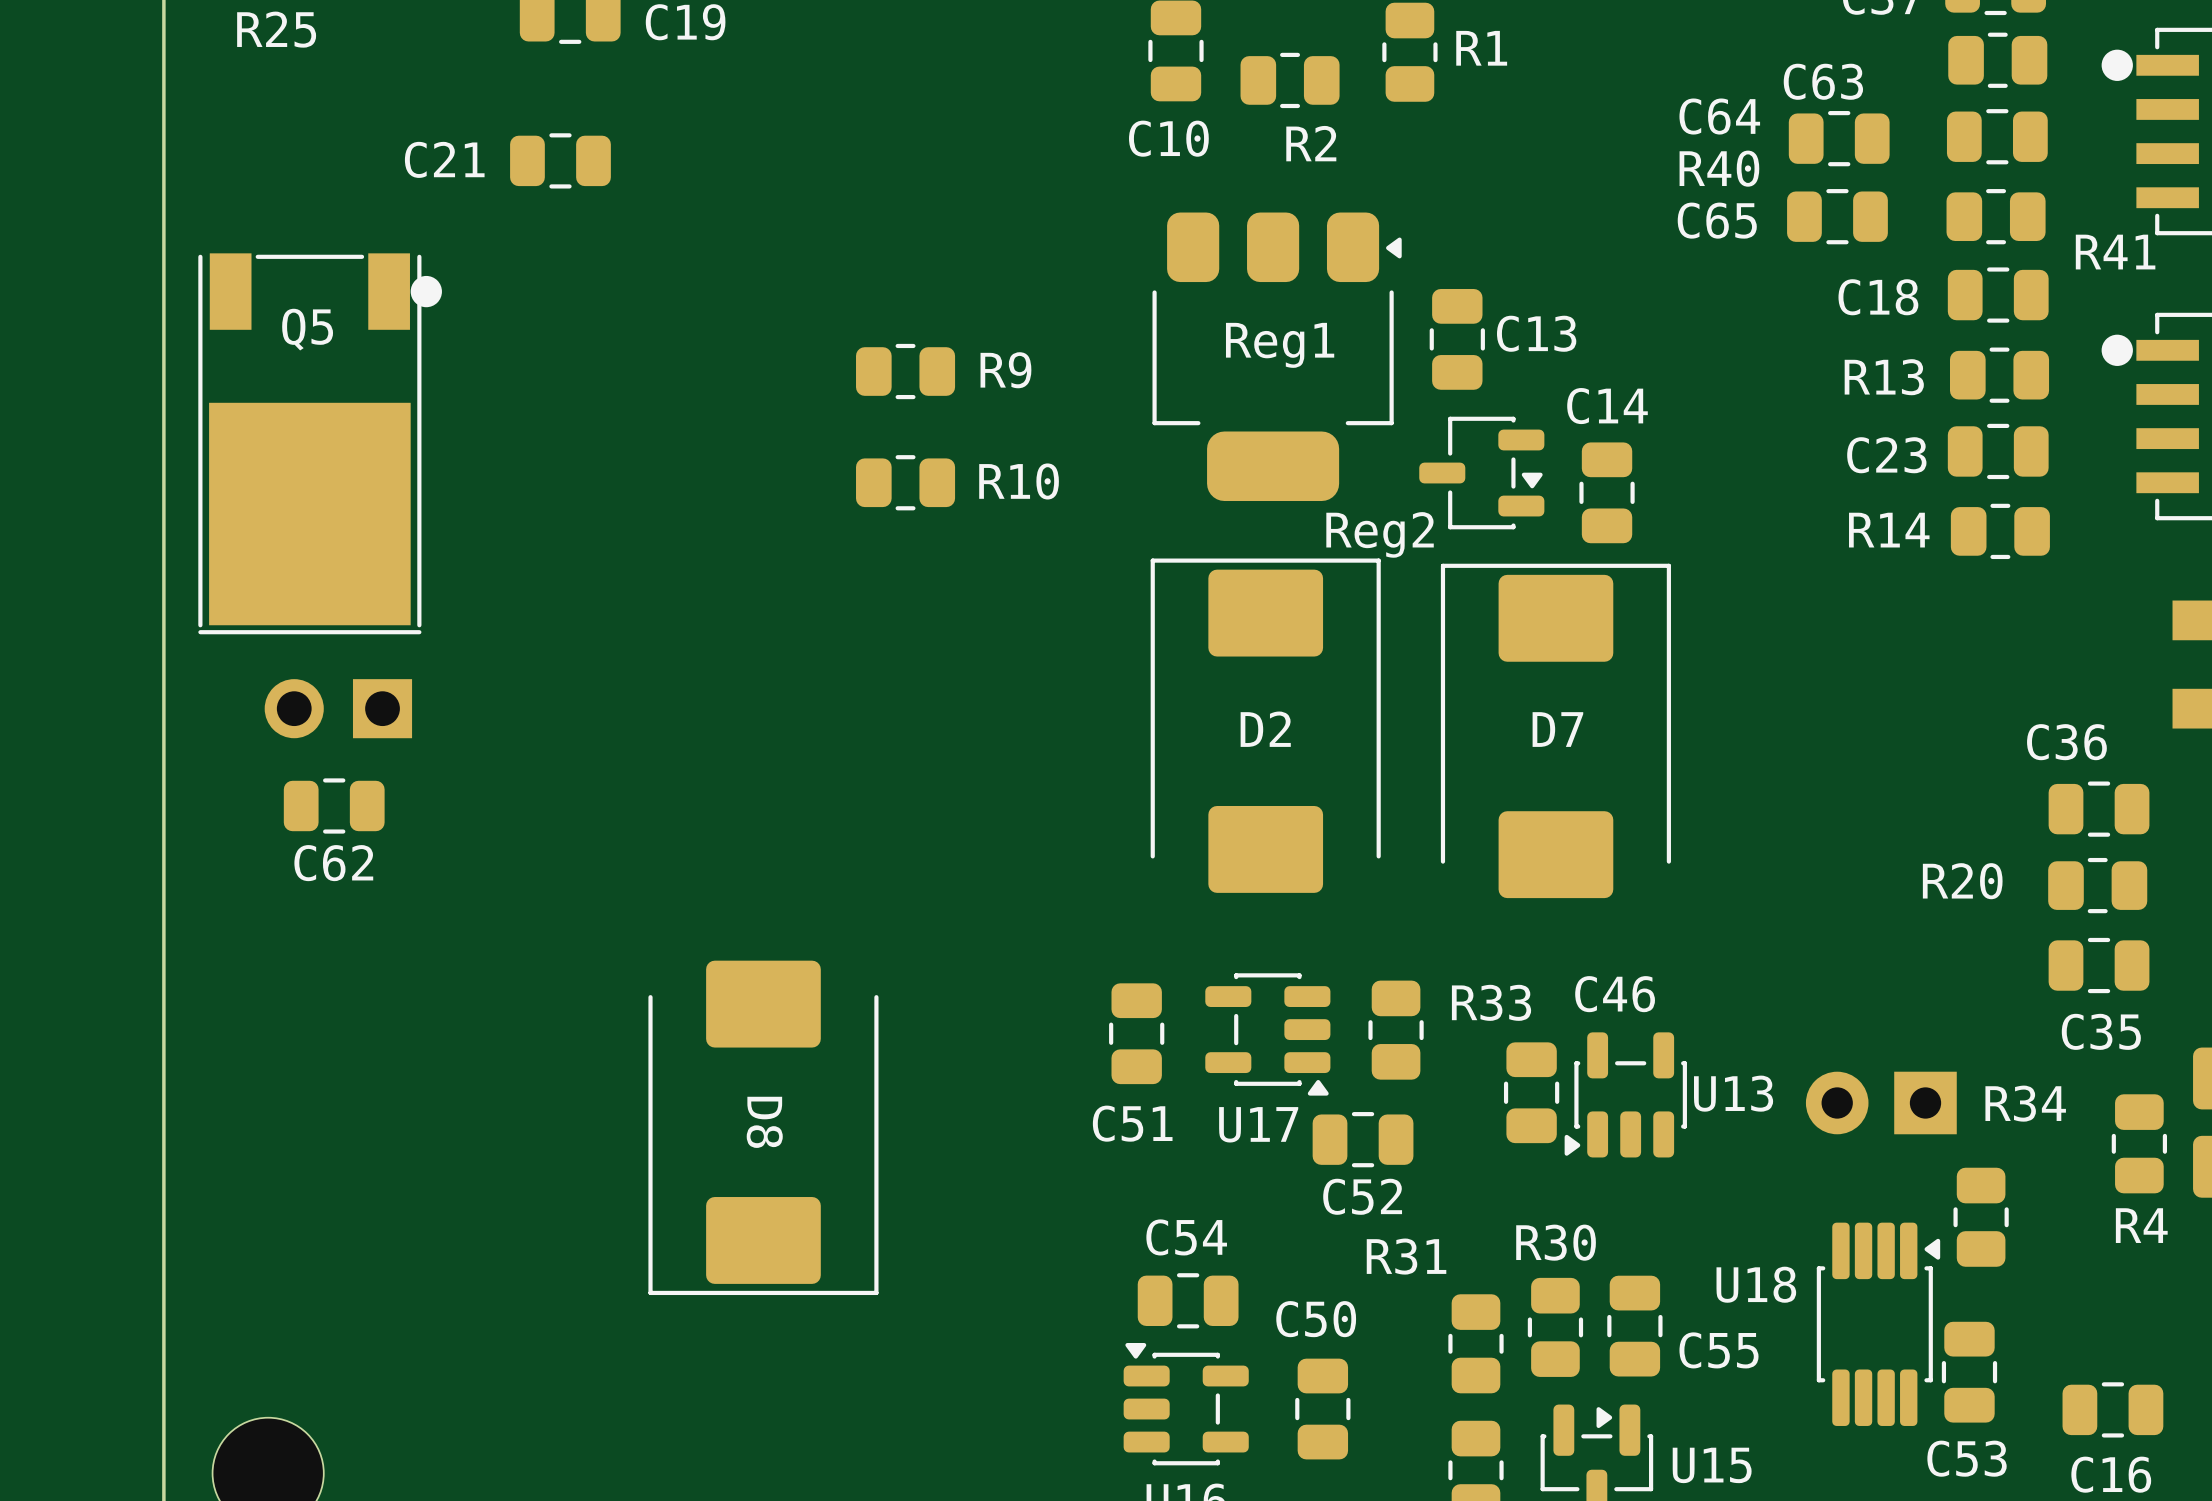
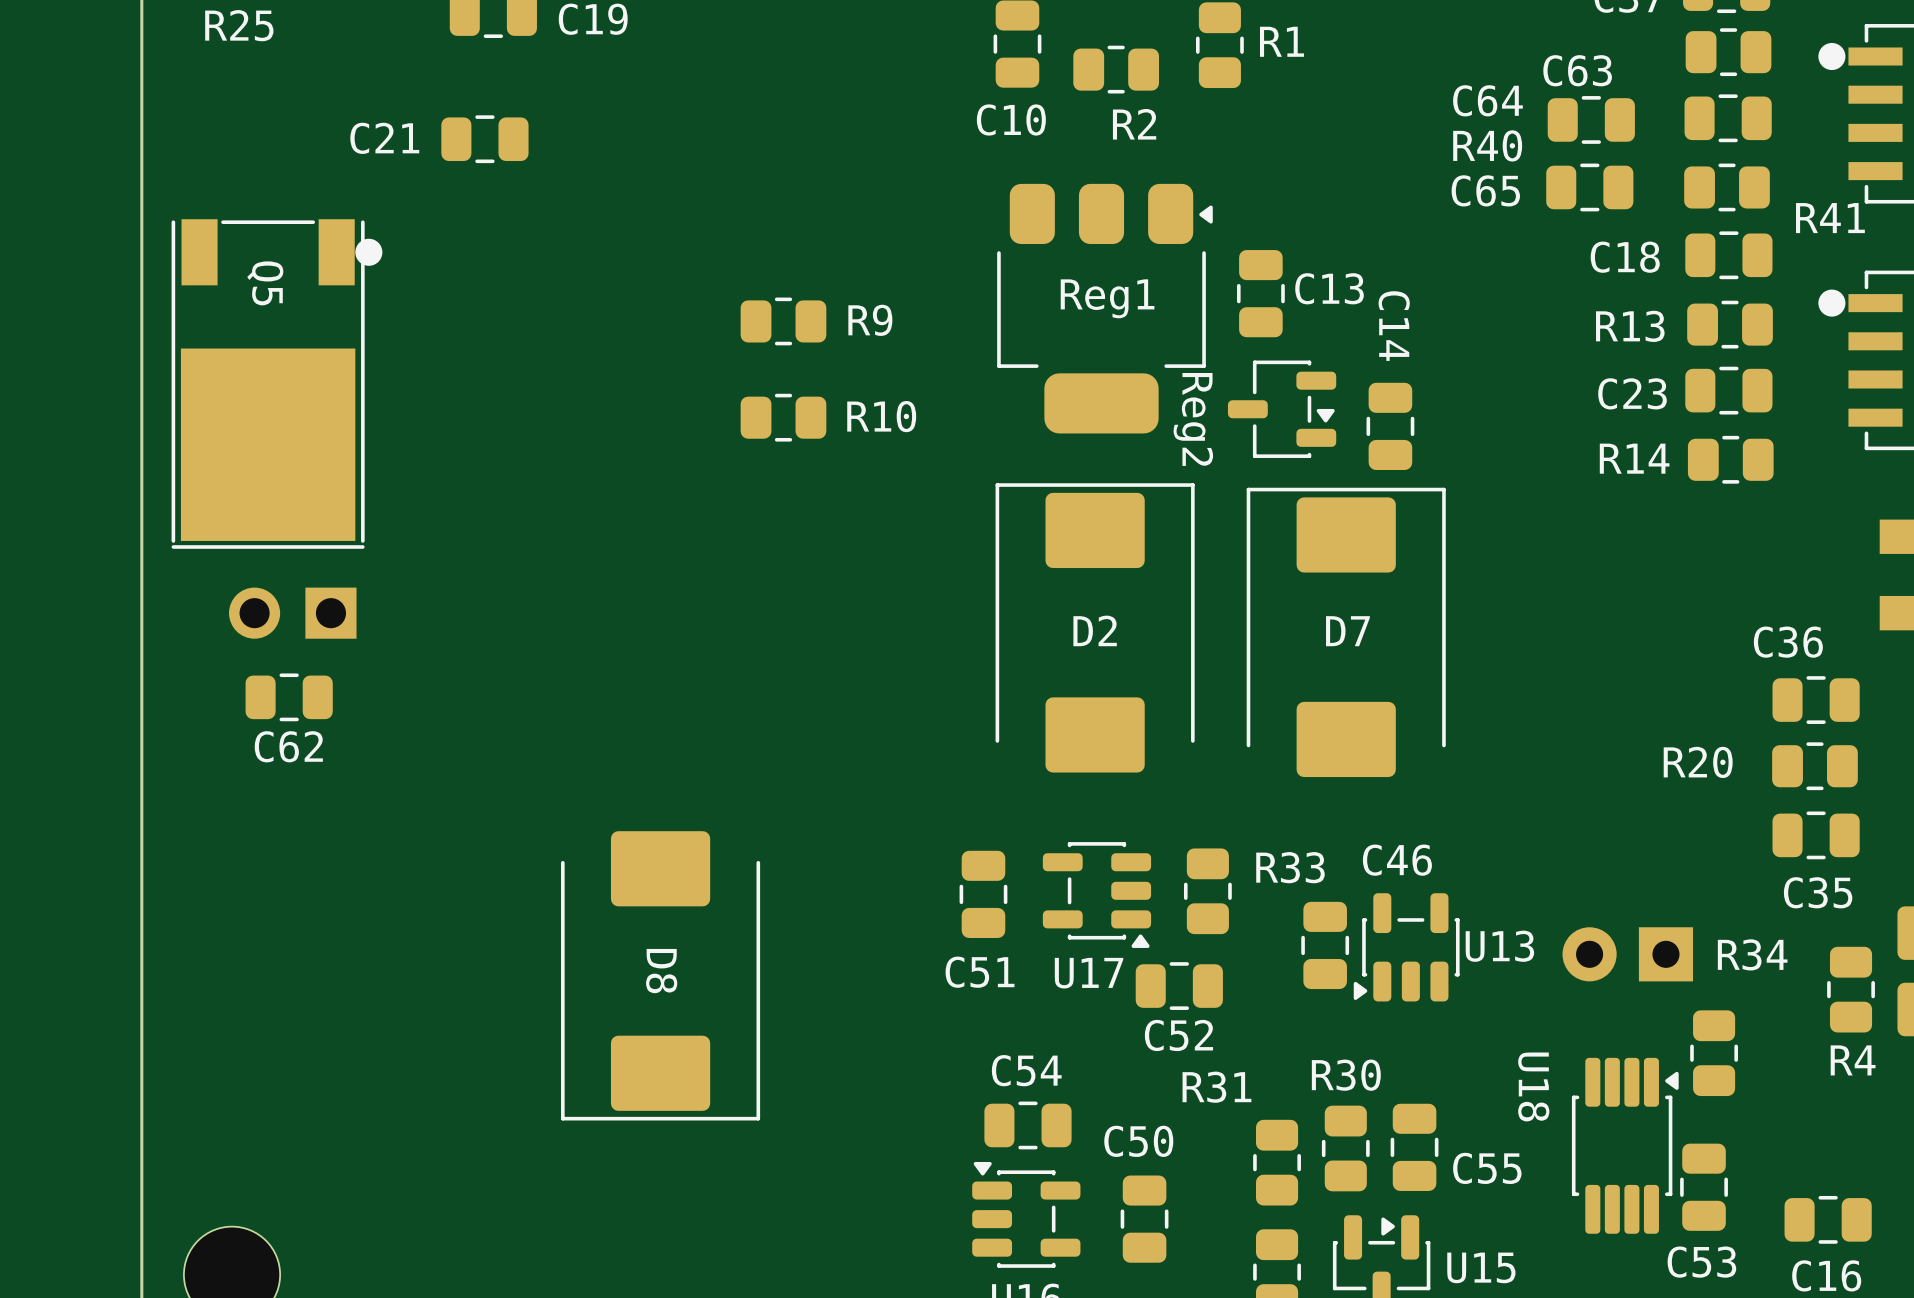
Q5 name rotation: 0° (307, 329) -> 90° clockwise (265, 283)
C14 name rotation: 0° (1607, 406) -> 90° clockwise (1394, 326)
Reg2 name rotation: 0° (1380, 534) -> 90° clockwise (1193, 419)
U18 name rotation: 0° (1756, 1284) -> 90° clockwise (1533, 1086)

